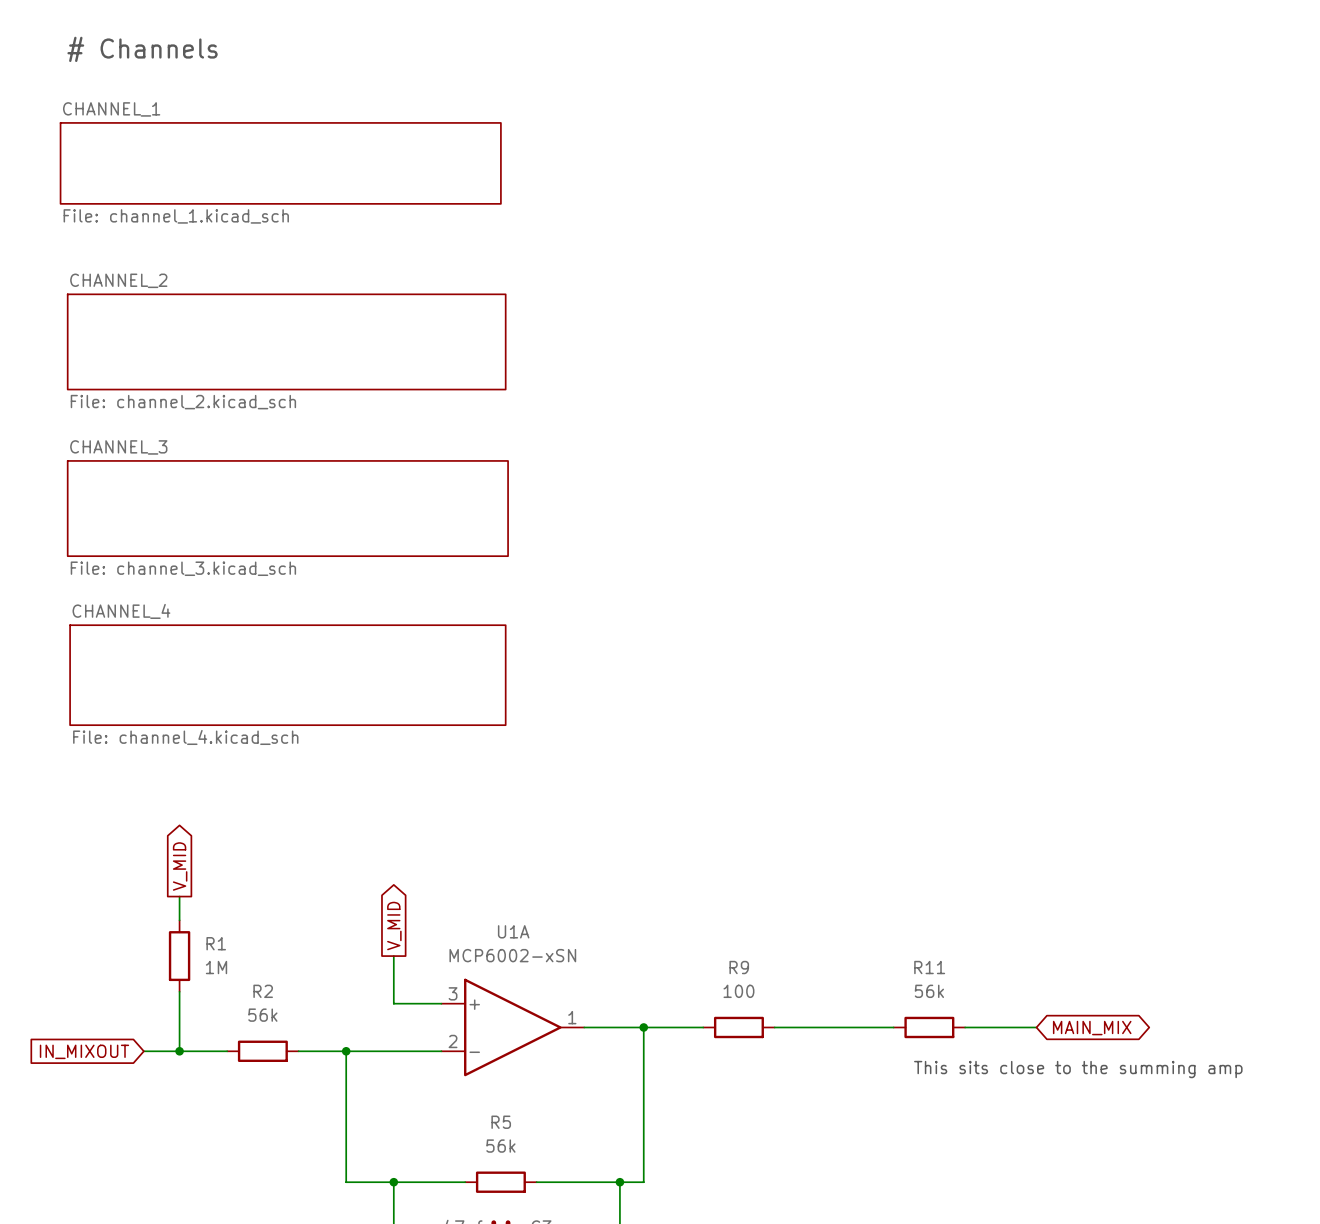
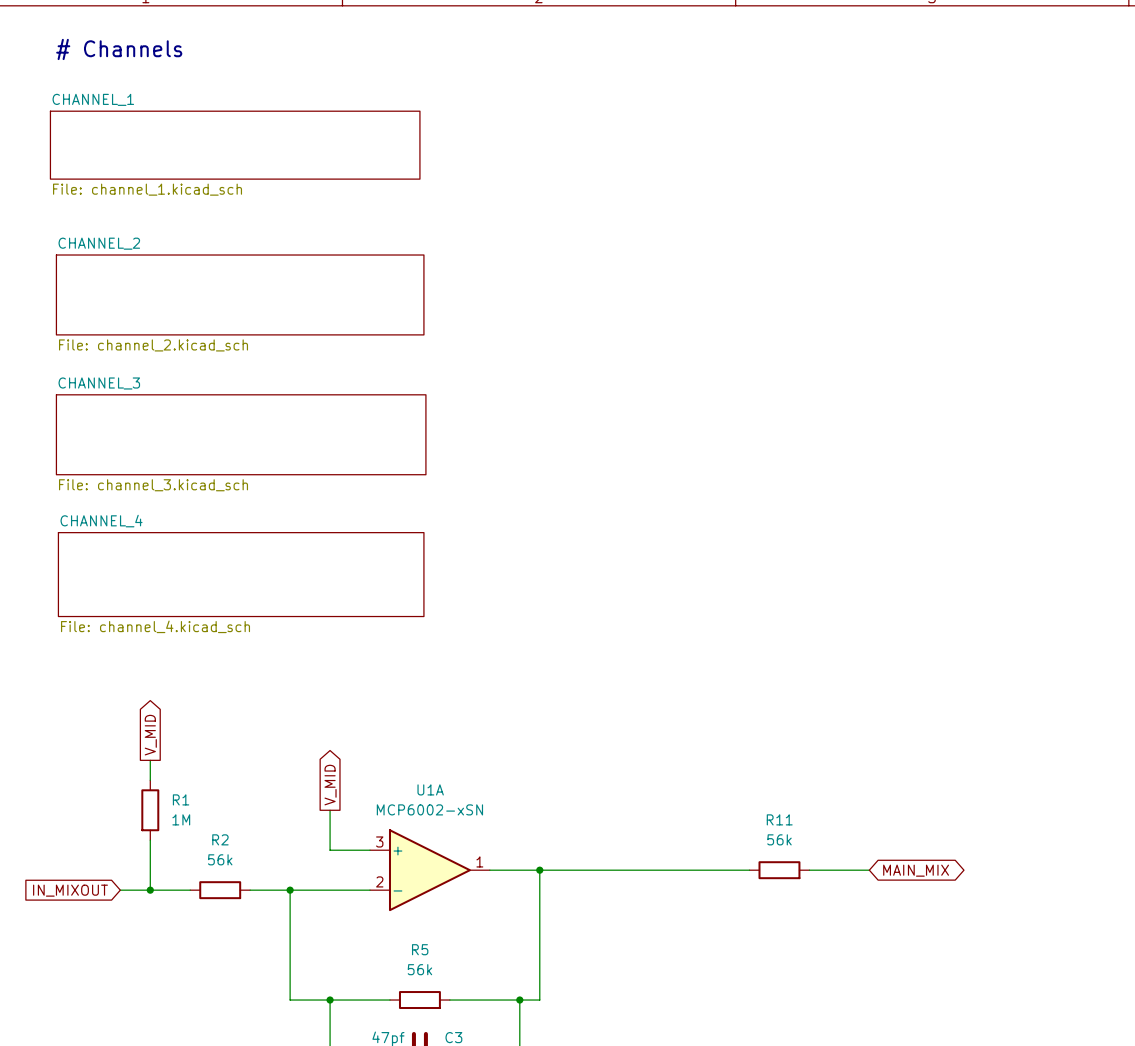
wire: none -> (589, 870) (649, 870)
R9: 100 (738, 1027) -> none
text: This sits close to the summing amp (1078, 1069) -> none

